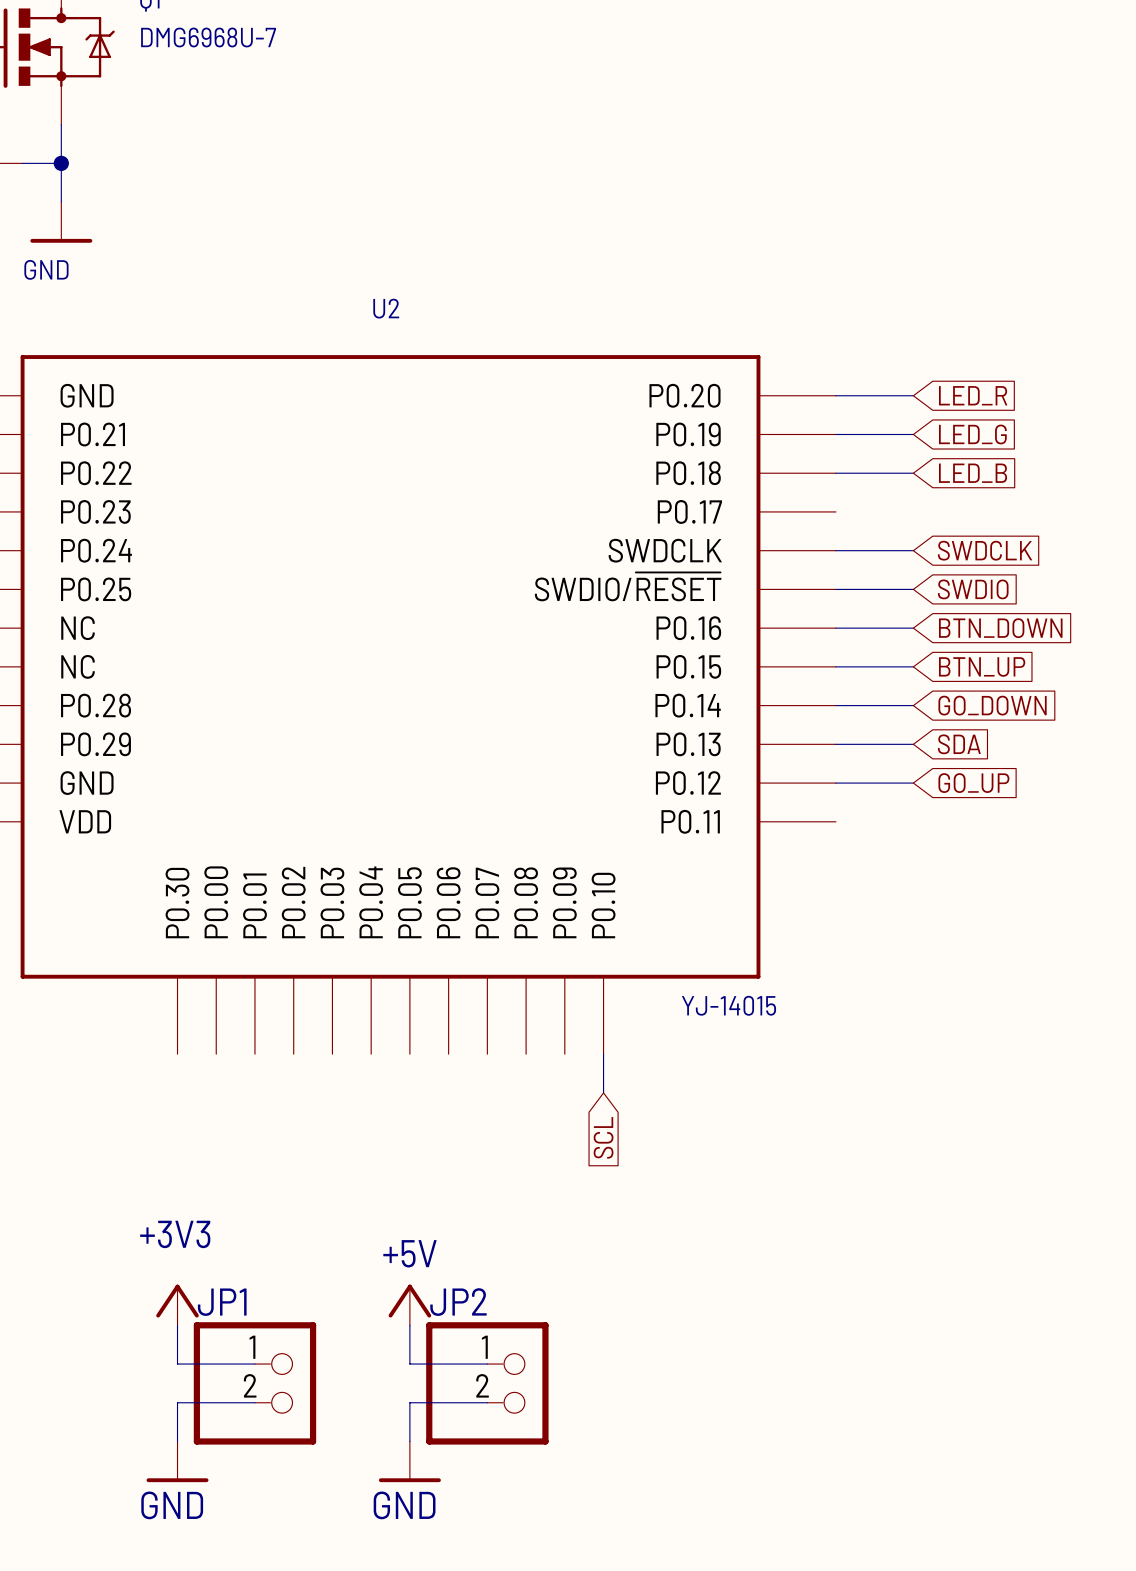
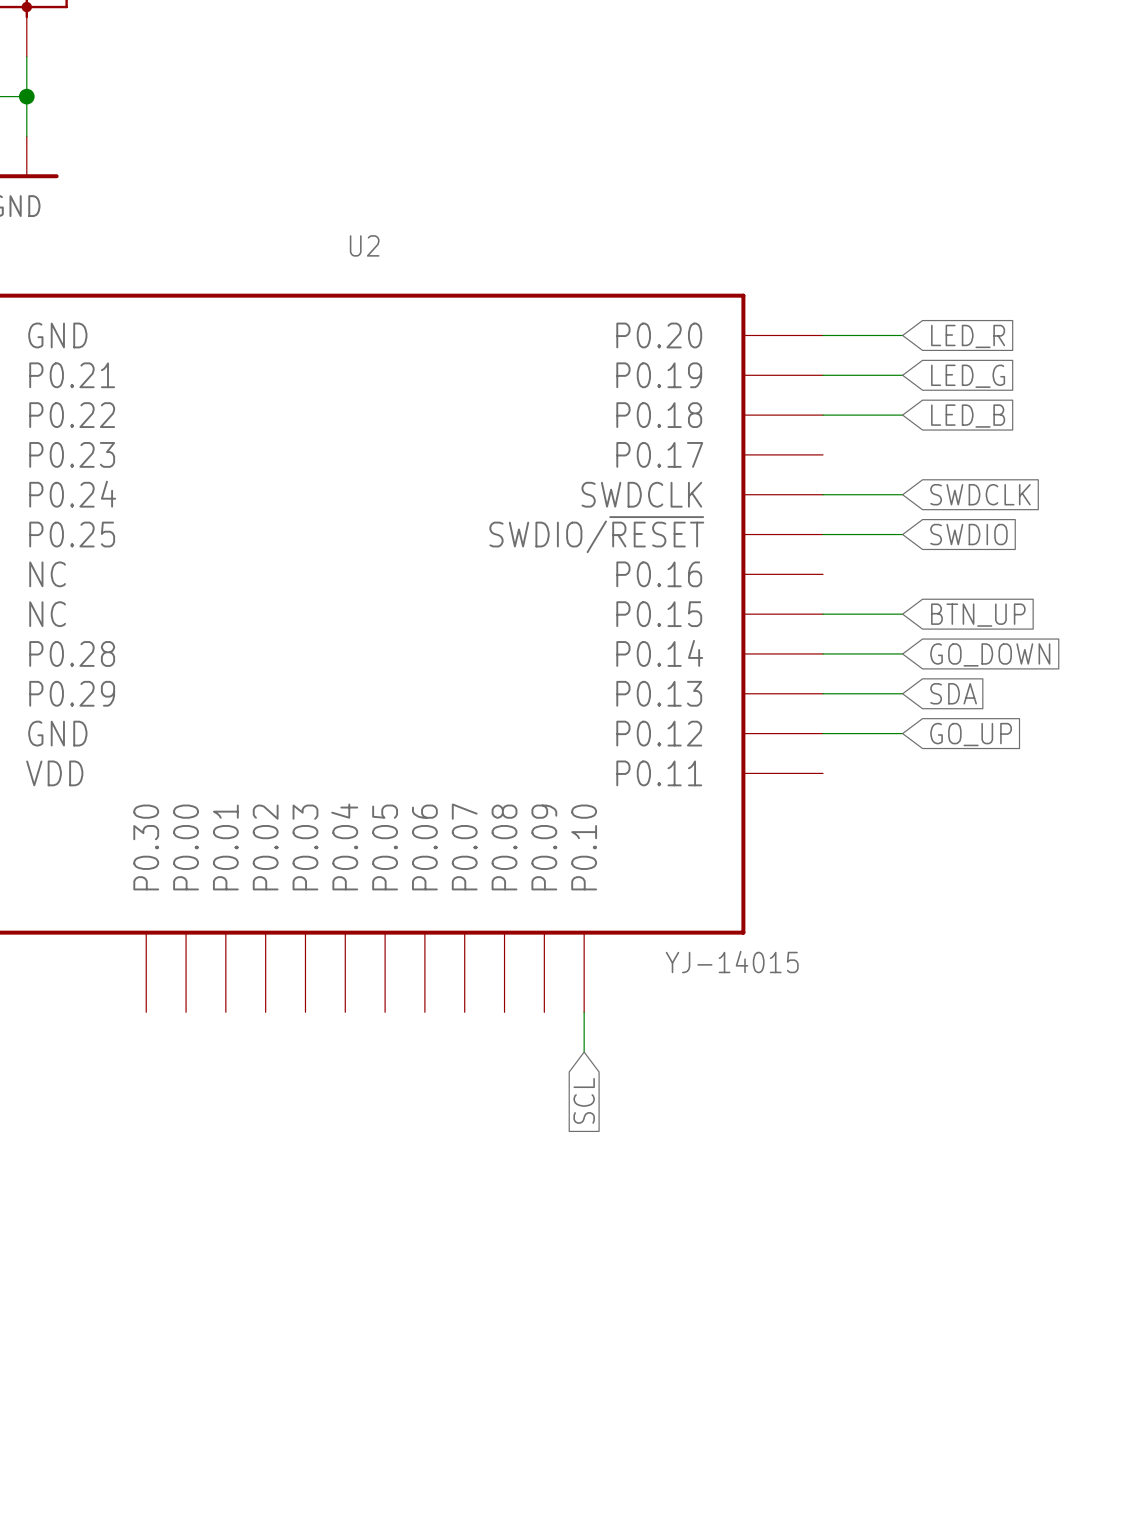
wire: (835, 628) (913, 628) -> none
global label: BTN_DOWN (1000, 628) -> none
power symbol: +3V3 (177, 1304) -> none
power symbol: +5V (409, 1304) -> none
wire: (177, 1325) (177, 1364) (254, 1364) -> none
wire: (409, 1325) (409, 1364) (487, 1364) -> none
JP1: (254, 1383) -> none
JP2: (487, 1383) -> none
wire: (254, 1402) (177, 1402) (177, 1441) -> none
wire: (487, 1402) (409, 1402) (409, 1441) -> none
power symbol: GND (177, 1461) -> none
power symbol: GND (409, 1461) -> none

